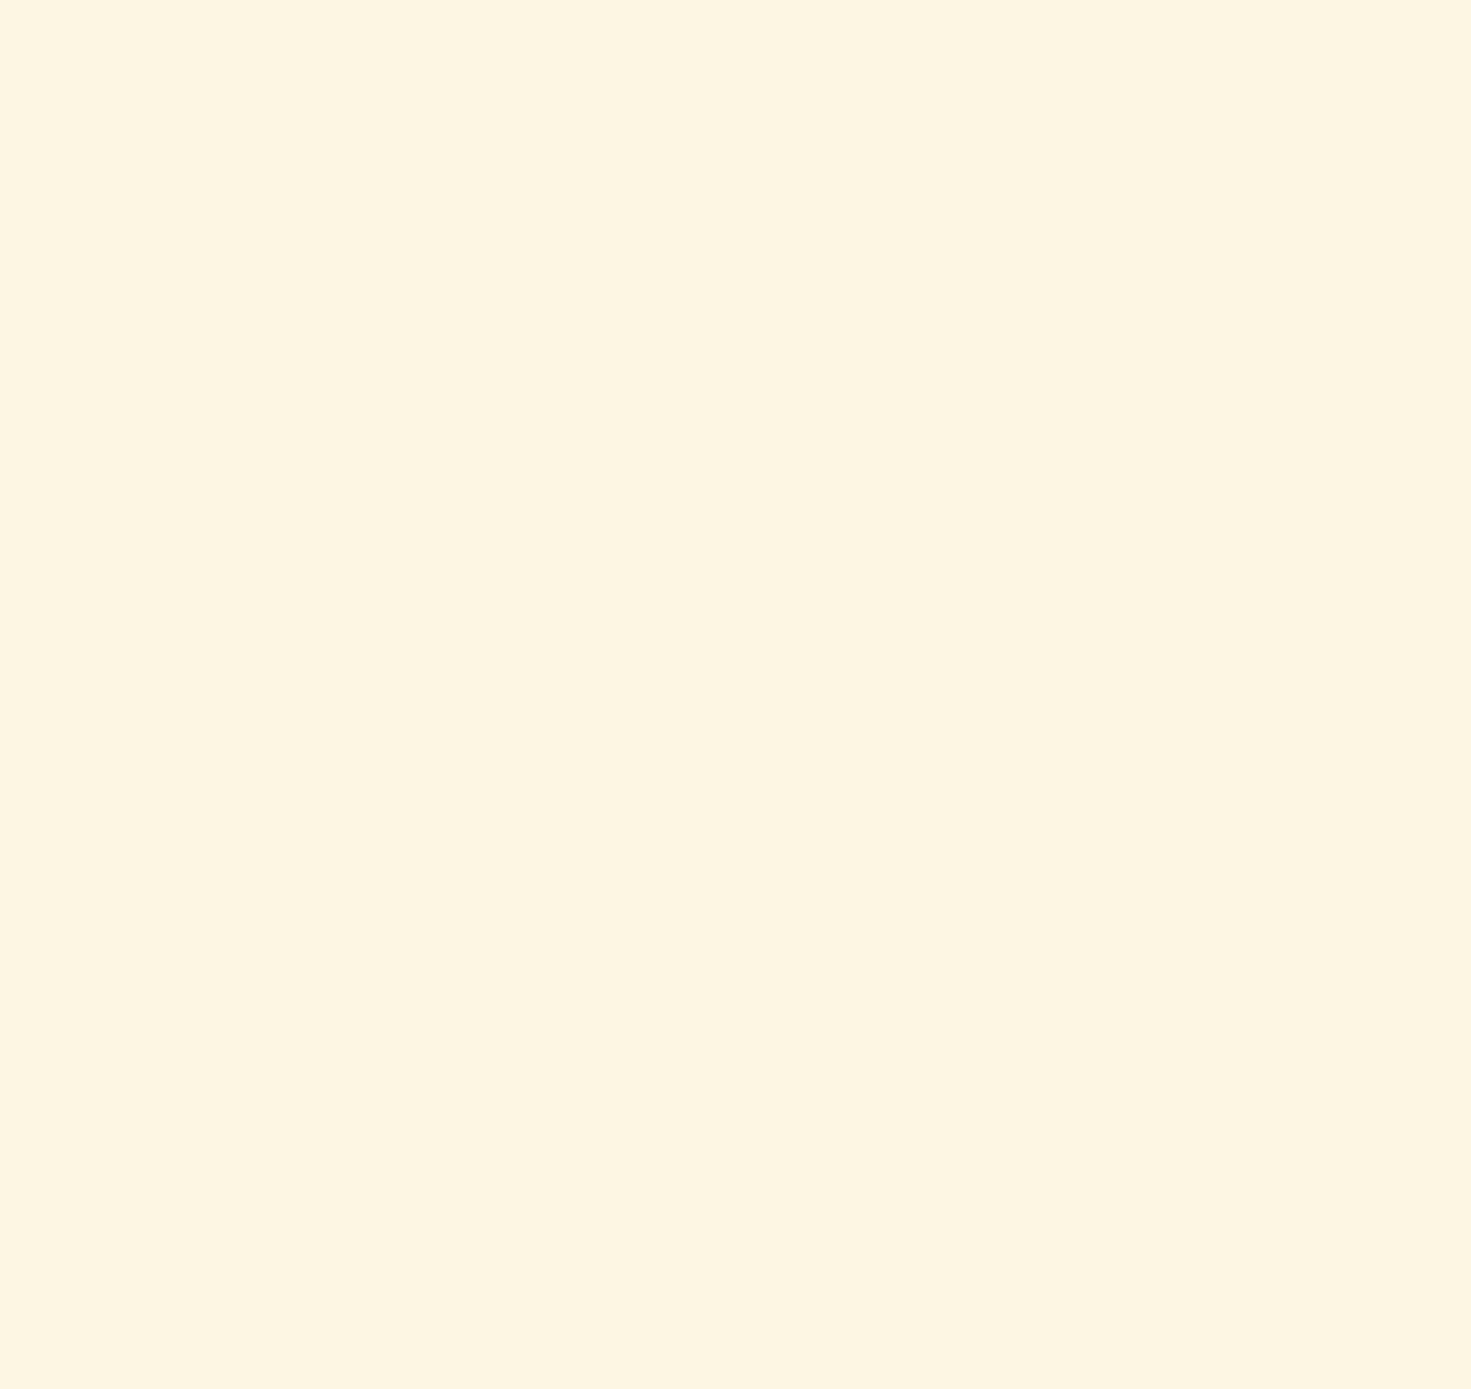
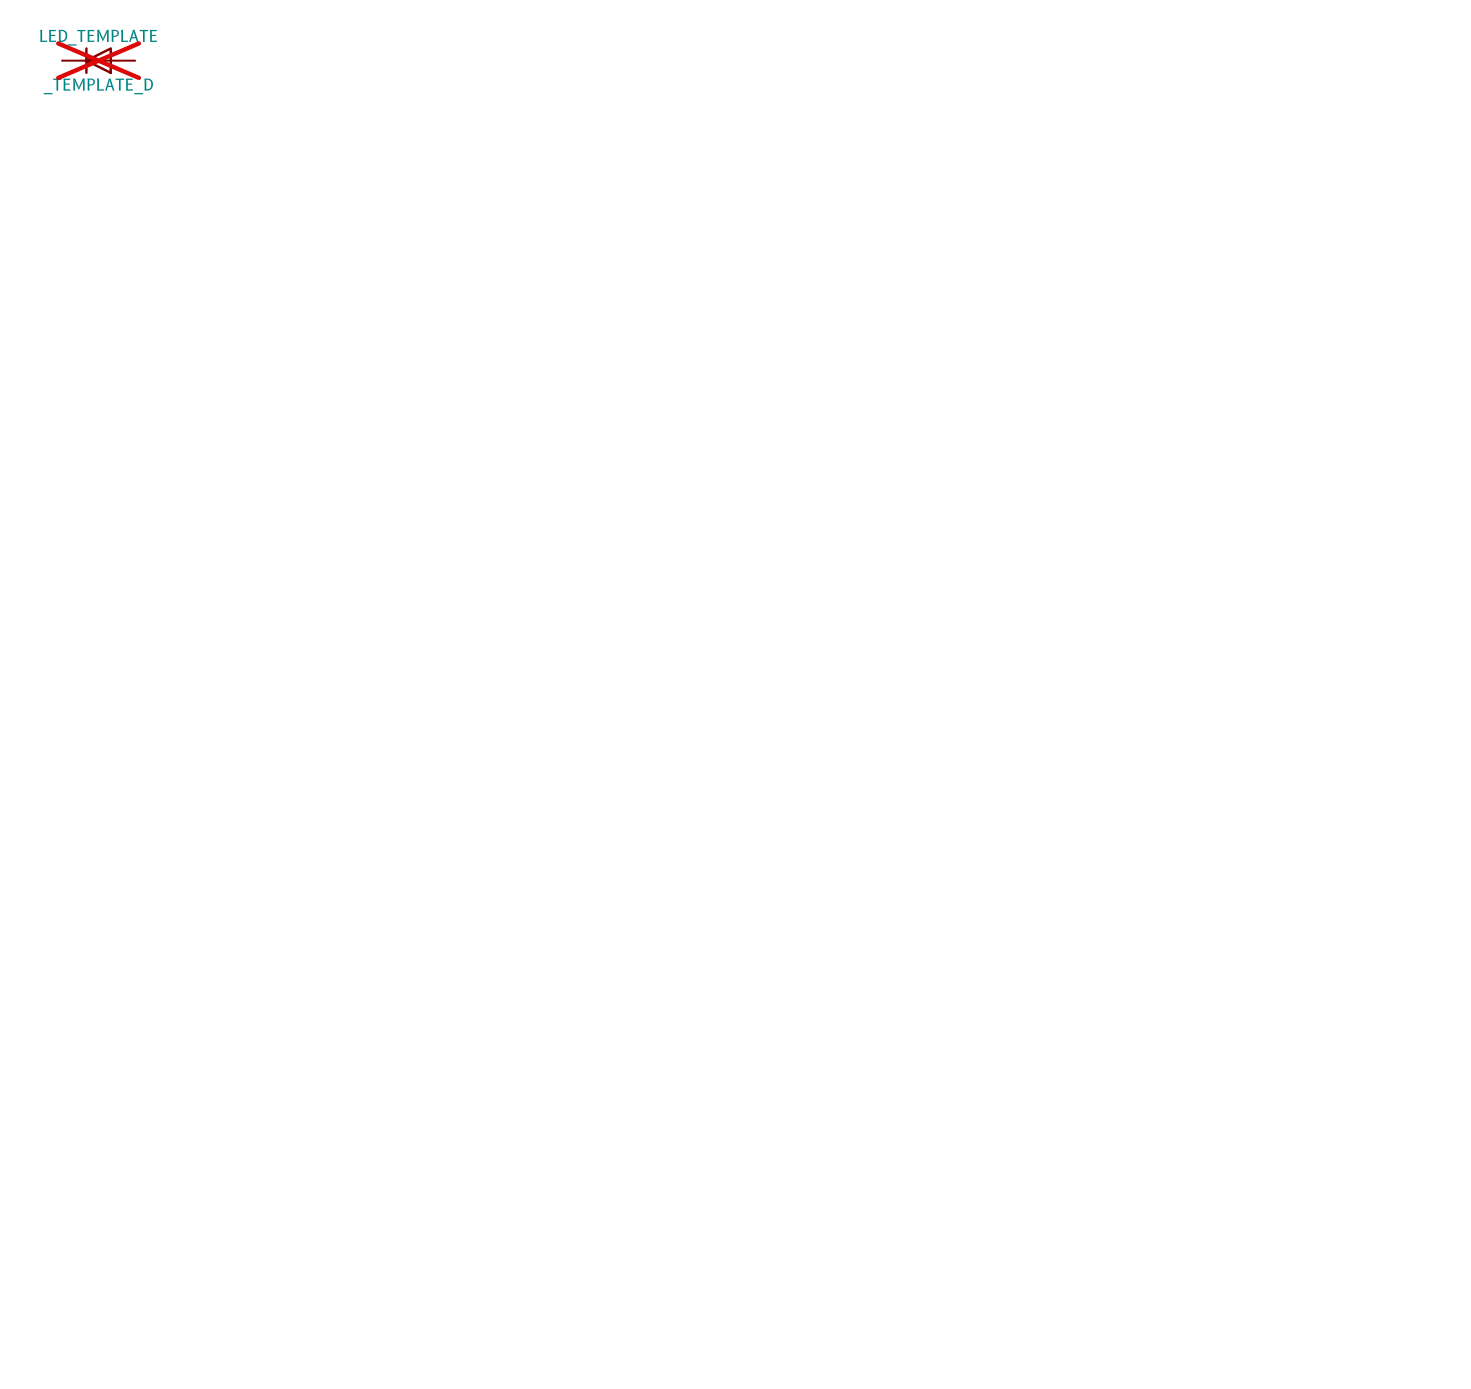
_TEMPLATE_D: none -> LED_TEMPLATE (98, 60)

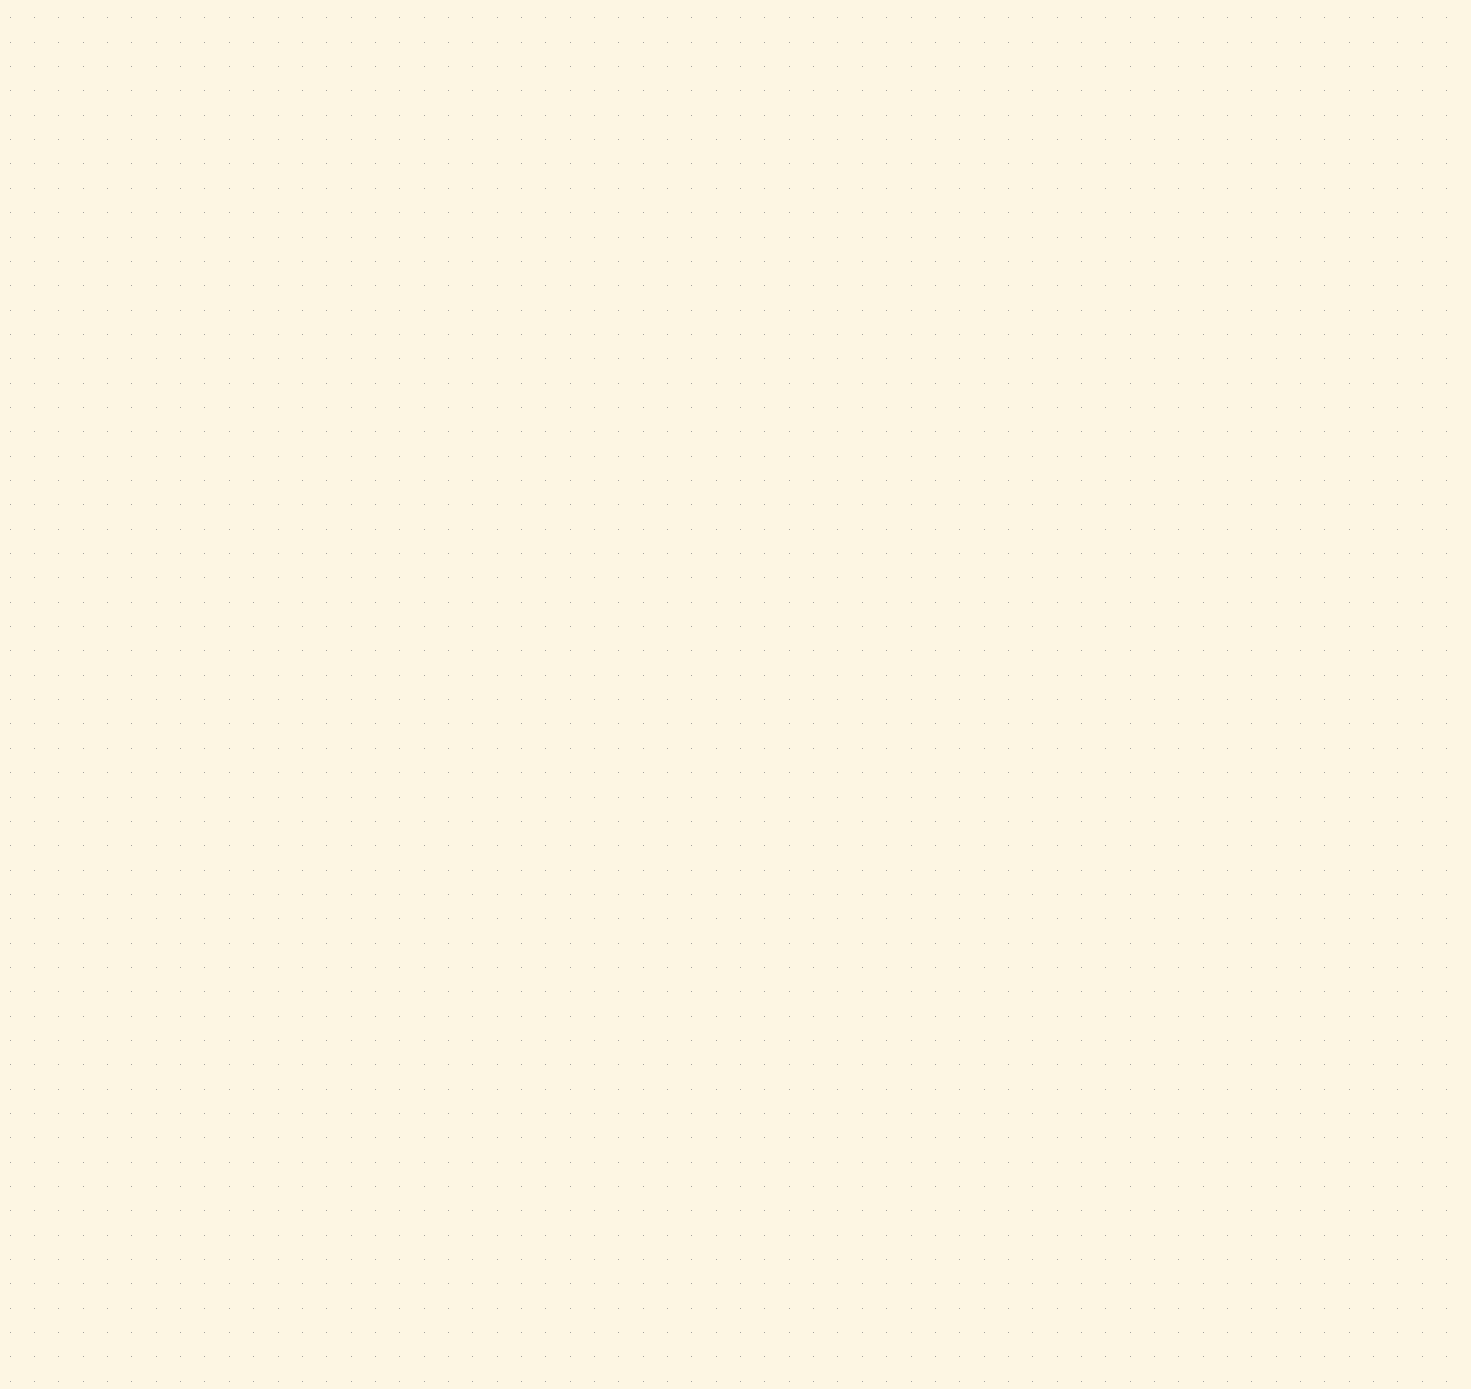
_TEMPLATE_D: LED_TEMPLATE (98, 60) -> none

